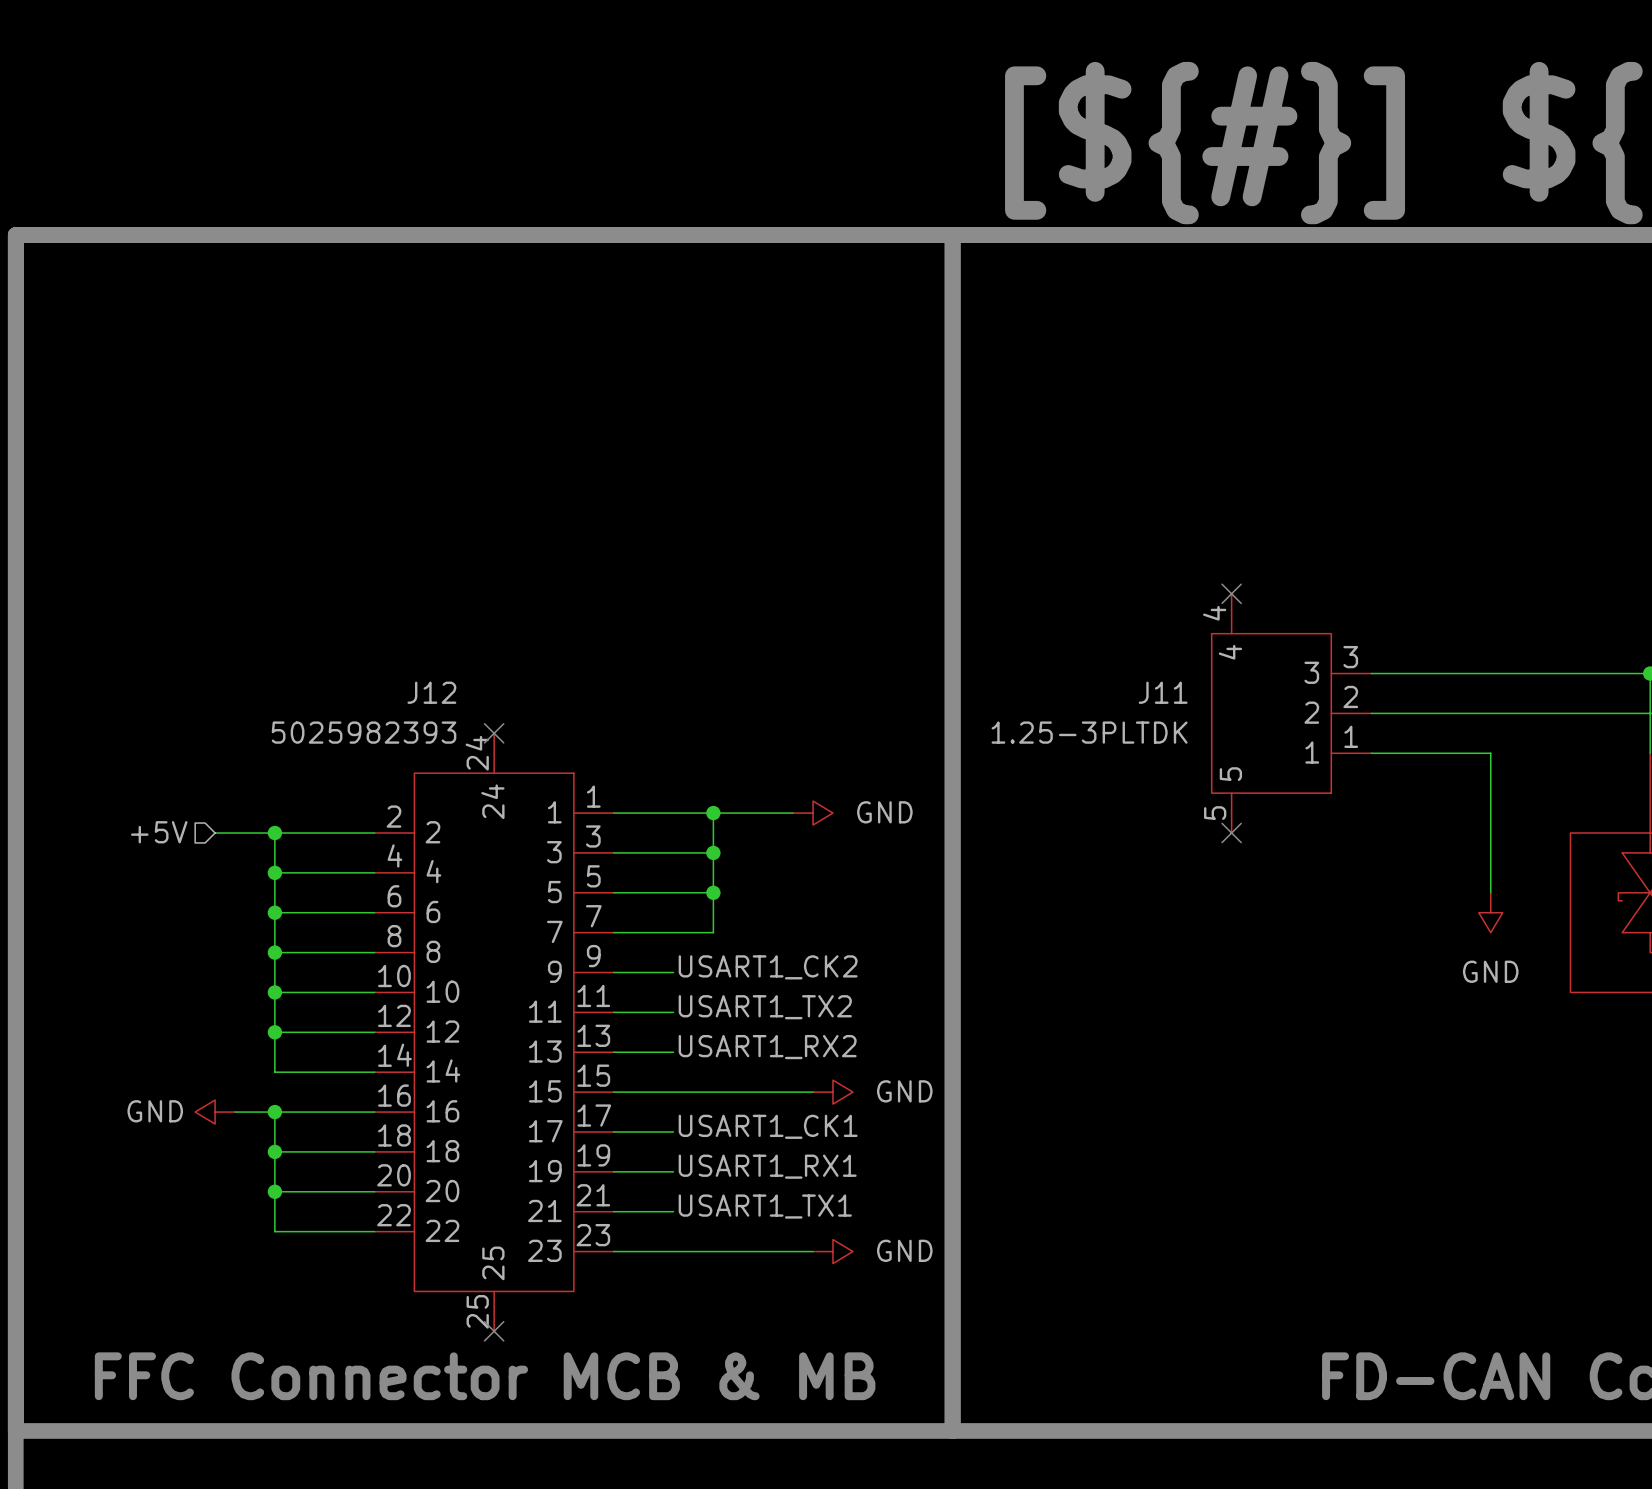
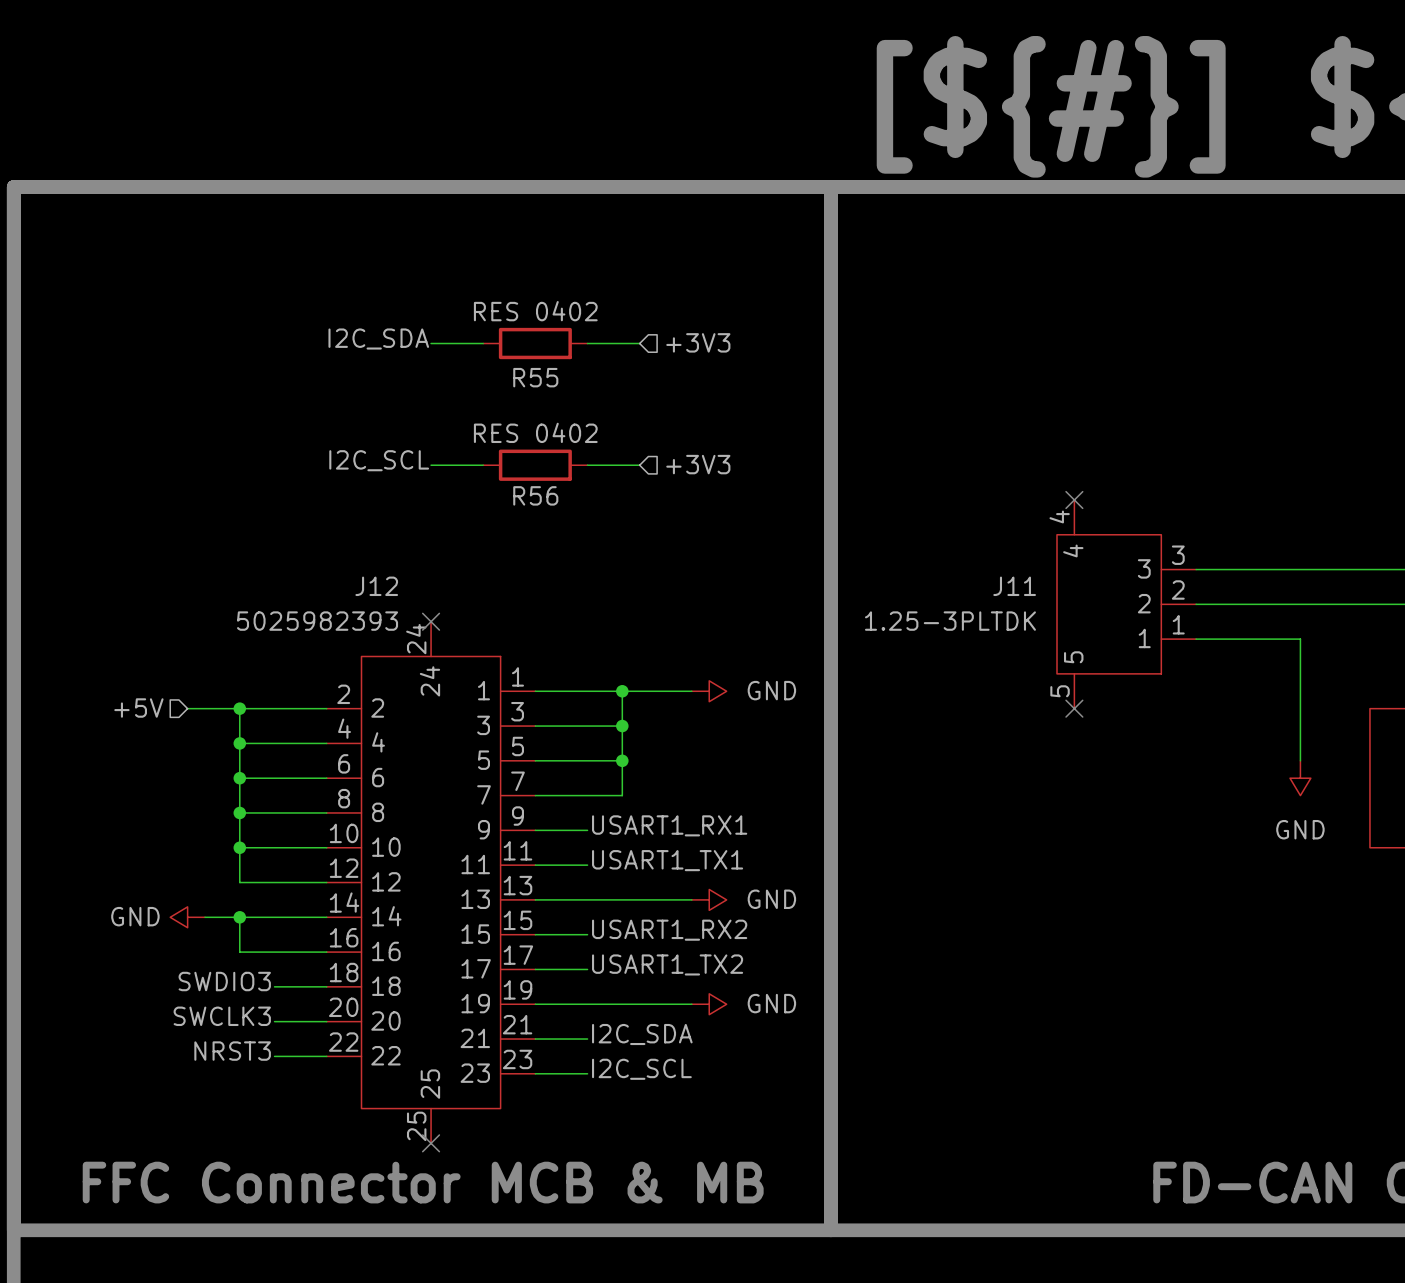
label: none -> I2C_SDA (378, 339)
hierarchical label: none -> +3V3 (698, 342)
wire: none -> (431, 343) (483, 343)
R55: none -> RES 0402 (535, 343)
wire: none -> (587, 343) (639, 343)
label: none -> I2C_SCL (379, 460)
wire: none -> (431, 465) (483, 465)
R56: none -> RES 0402 (535, 465)
wire: none -> (587, 465) (639, 465)
hierarchical label: none -> +3V3 (698, 464)
label: USART1_CK2 (768, 967) -> USART1_RX1 (669, 825)
label: USART1_TX2 (765, 1007) -> USART1_TX1 (667, 860)
wire: (274, 1032) (274, 1072) -> none
junction: (274, 1032) -> none
label position: USART1_RX2 (767, 1047) -> USART1_RX2 (669, 930)
wire: none -> (587, 899) (691, 899)
power symbol: none -> GND (709, 899)
wire: none -> (205, 917) (239, 917) (239, 952)
junction: none -> (239, 917)
wire: (673, 1092) (813, 1092) -> none
power symbol: GND (832, 1092) -> none
power symbol position: GND (215, 1112) -> GND (187, 917)
wire: (235, 1112) (274, 1112) (274, 1231) (314, 1231) -> none
junction: (274, 1112) -> none
label: USART1_CK1 (768, 1126) -> USART1_TX2 (667, 964)
label: none -> SWDIO3 (224, 981)
wire: (274, 1151) (314, 1151) -> none
junction: (274, 1151) -> none
label: USART1_RX1 (767, 1166) -> none
wire: none -> (587, 1004) (691, 1004)
power symbol: none -> GND (709, 1004)
label: none -> SWCLK3 (222, 1016)
wire: (274, 1191) (314, 1191) -> none
junction: (274, 1191) -> none
label: USART1_TX1 (765, 1206) -> I2C_SDA (642, 1034)
label: none -> NRST3 (232, 1051)
label: none -> I2C_SCL (641, 1069)
wire: (673, 1251) (813, 1251) -> none
power symbol: GND (832, 1251) -> none

